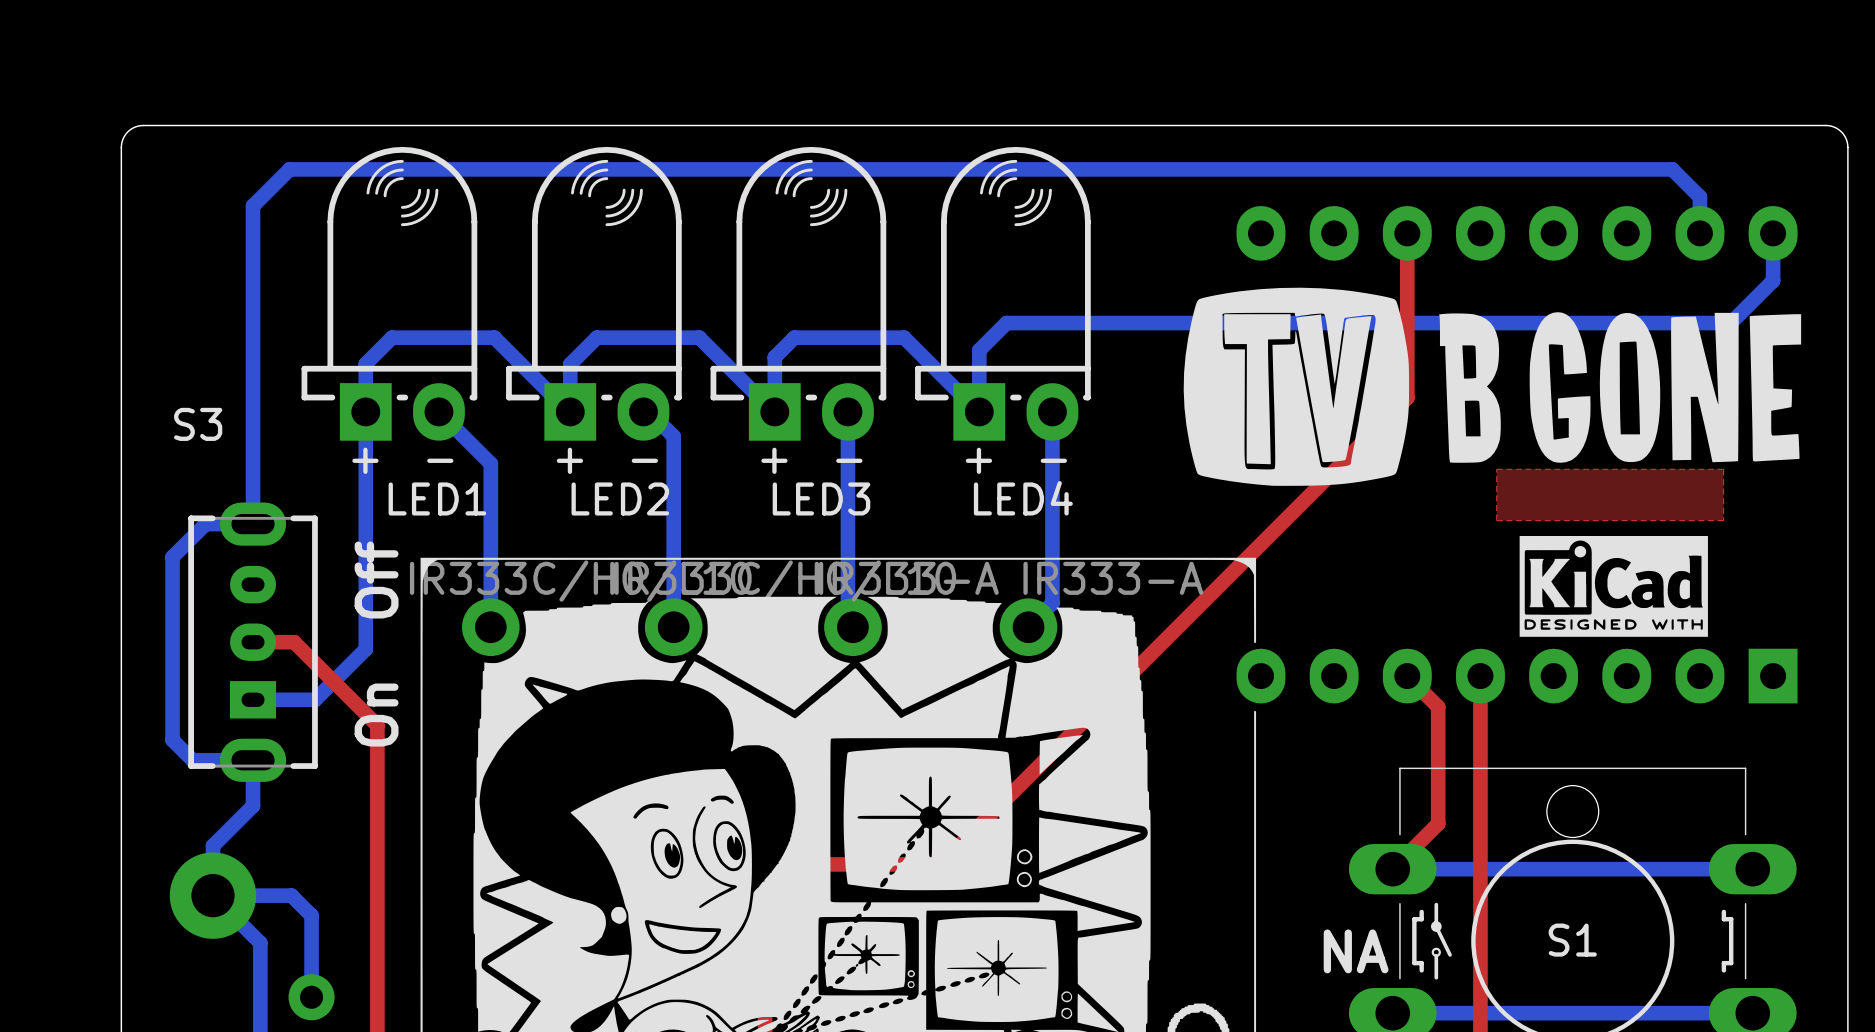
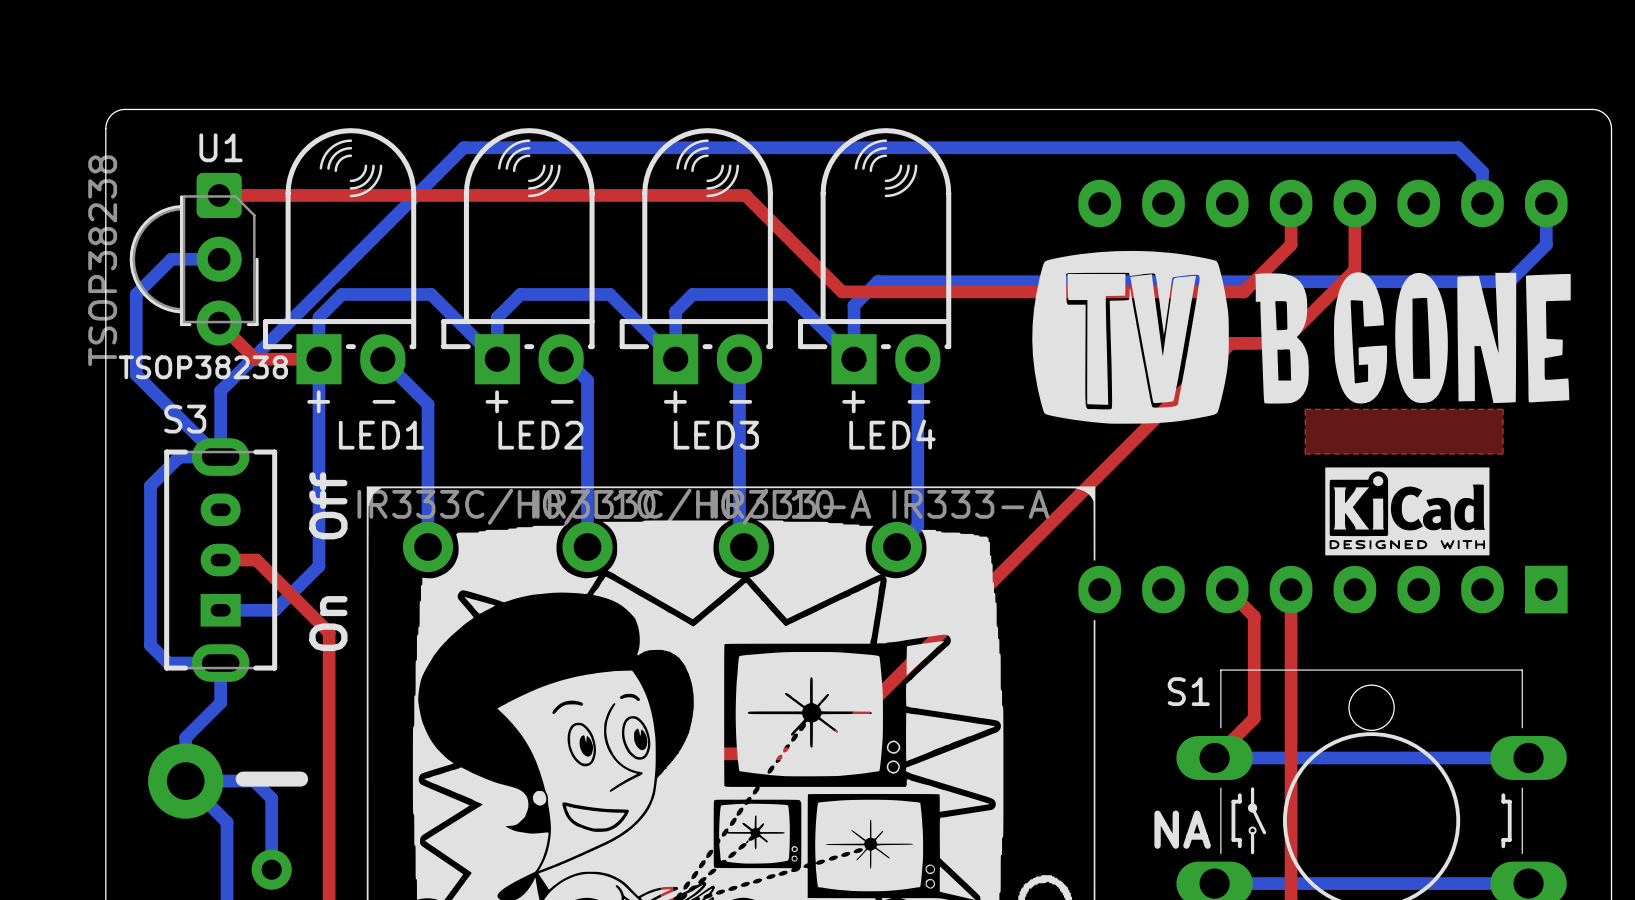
bottom track: (531, 169) (289, 169) (253, 205) (253, 448) -> (463, 147) (220, 390)
top track: none -> (219, 195) (745, 195) (842, 291) (1243, 291) (1291, 244) (1291, 203)
top track: (1407, 233) (1407, 397) -> (1354, 203) (1354, 270) (1281, 343) (1230, 343) (1227, 346)
U1: none -> TSOP38238 (194, 259)
bottom track: none -> (219, 259) (171, 259) (136, 294) (136, 374) (218, 457)
top track: none -> (219, 323) (255, 359) (319, 359)
text: none -> TSOP38238 (203, 367)
S3 name position: S3 (198, 424) -> S3 (185, 419)
text: none -> - (271, 779)
S1 name position: S1 (1572, 940) -> S1 (1188, 691)

